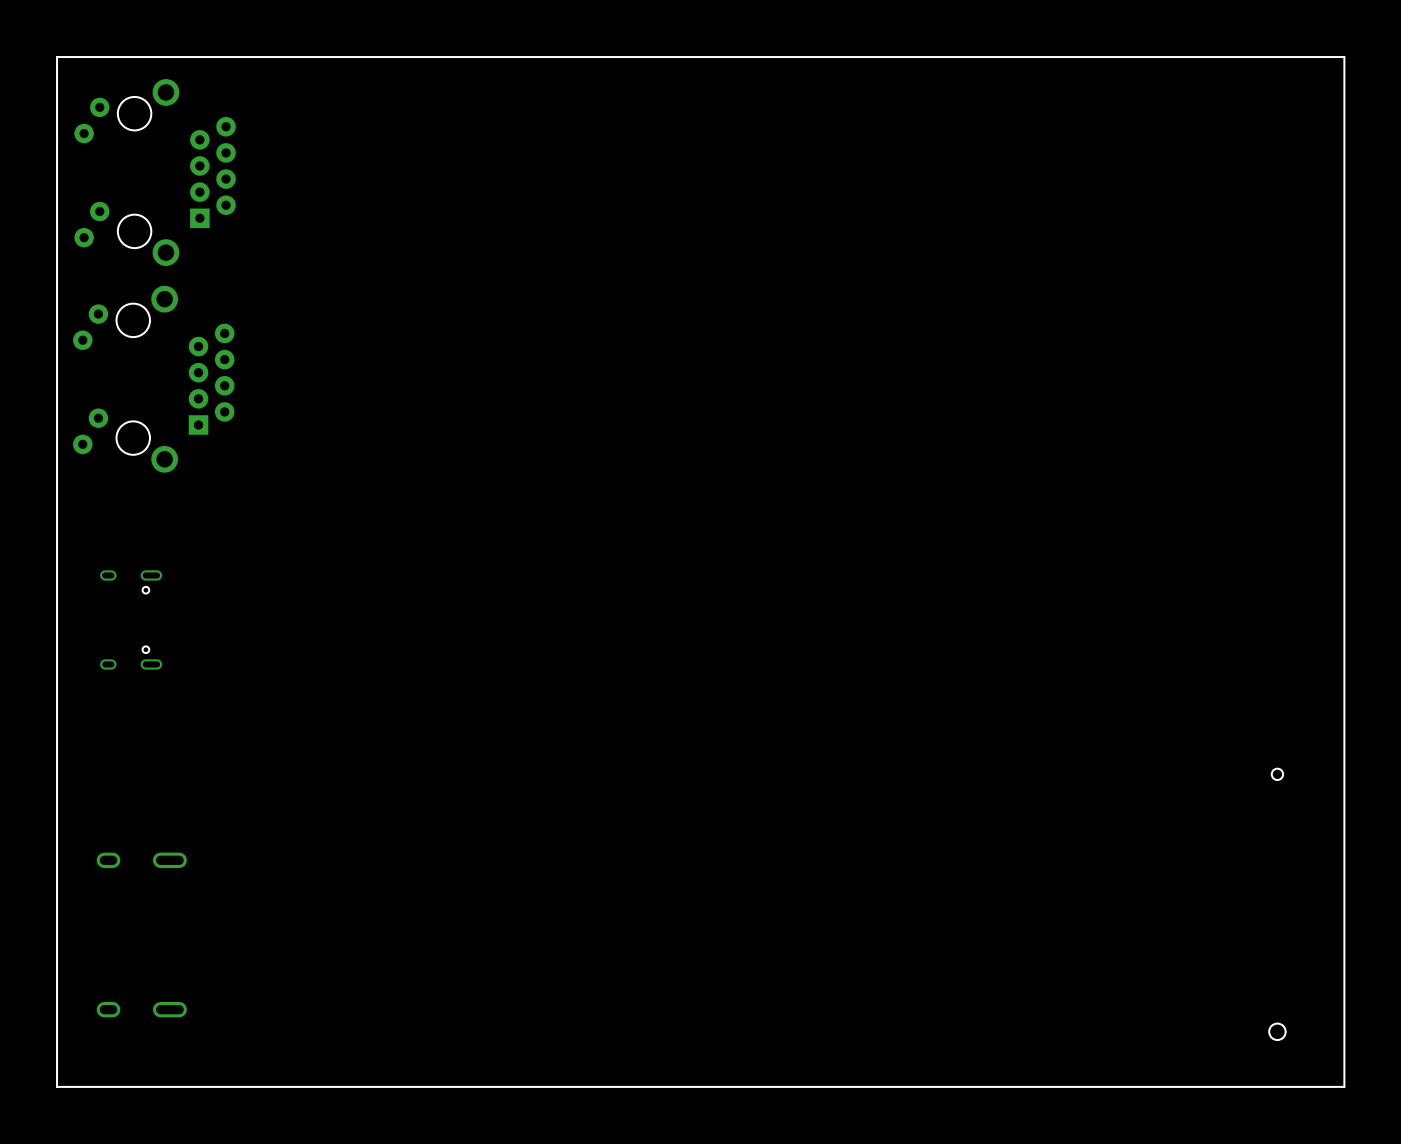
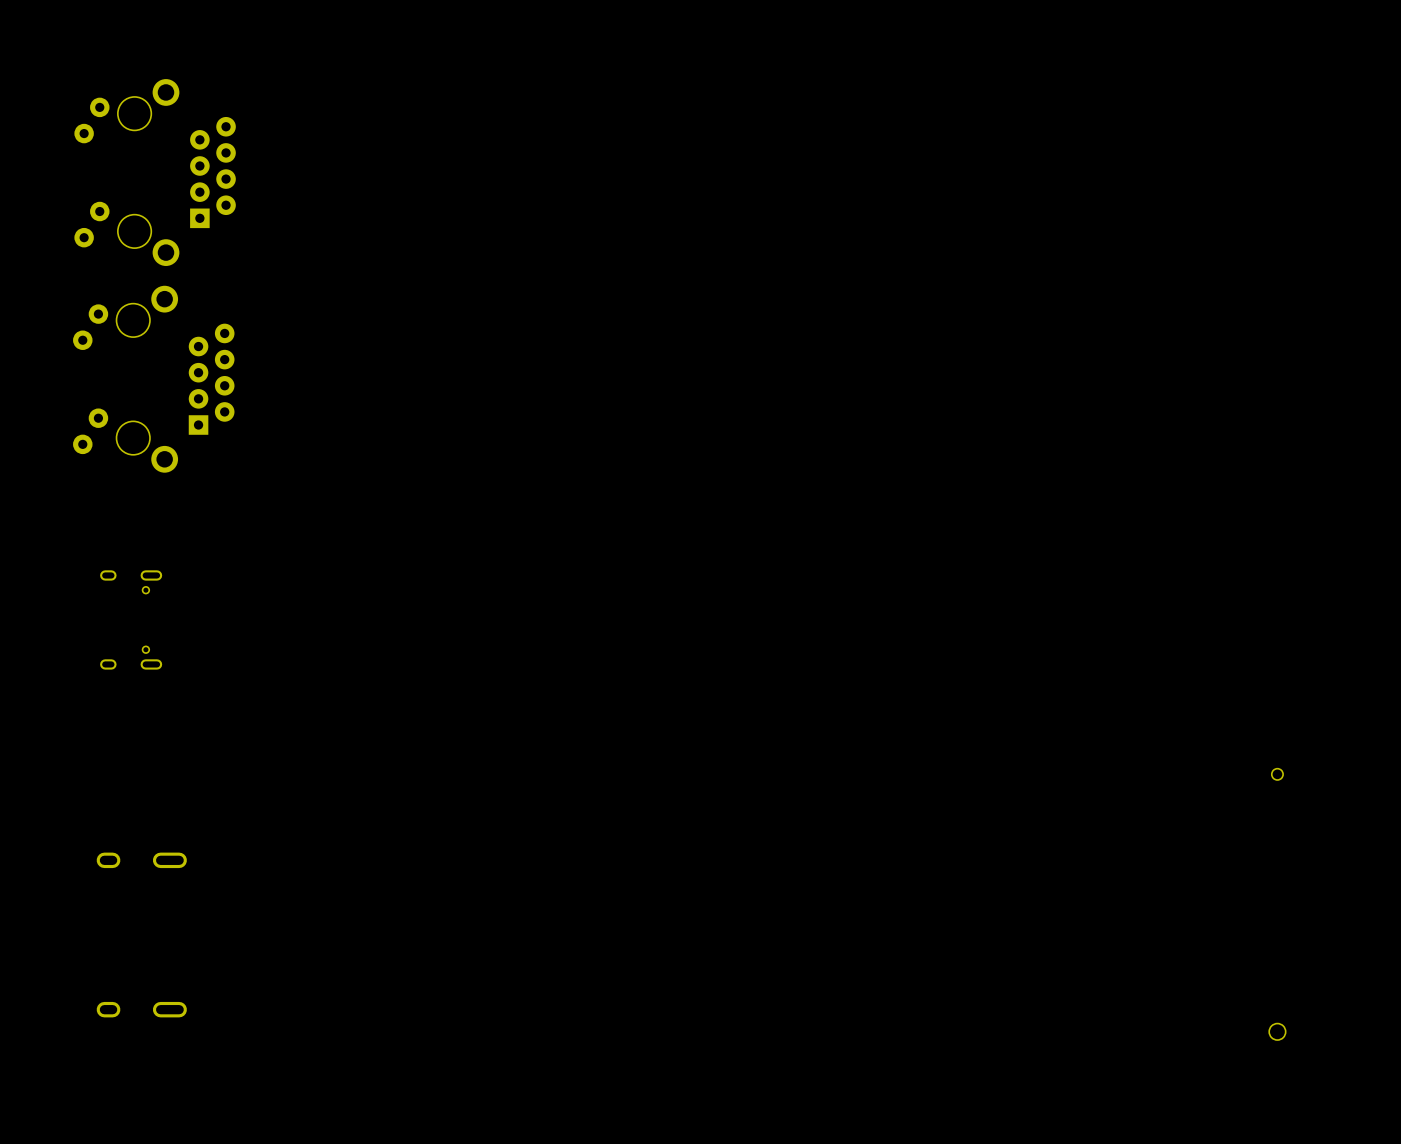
board edge: (1344, 57) (57, 57) (57, 1086) (1344, 1086) (1344, 57) -> none

